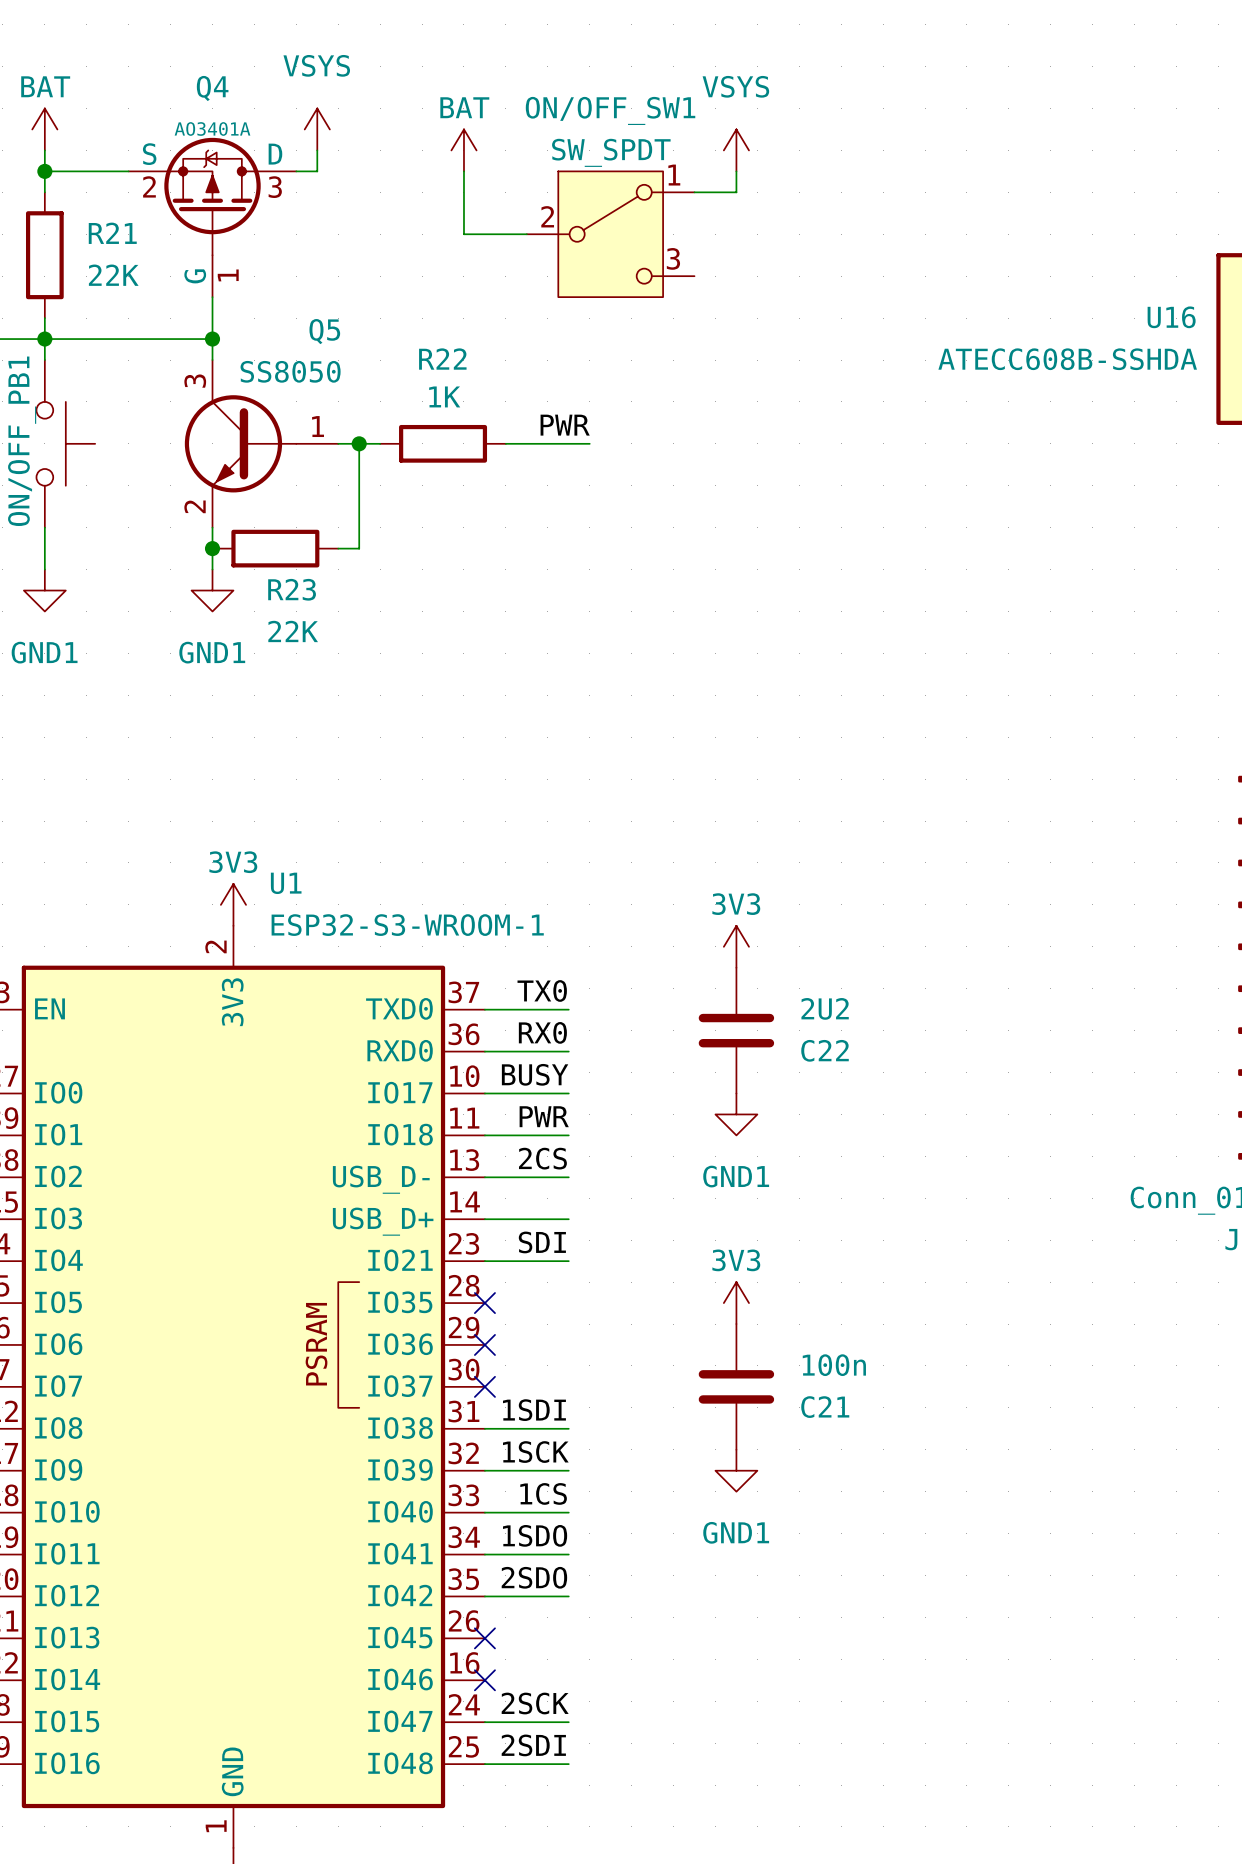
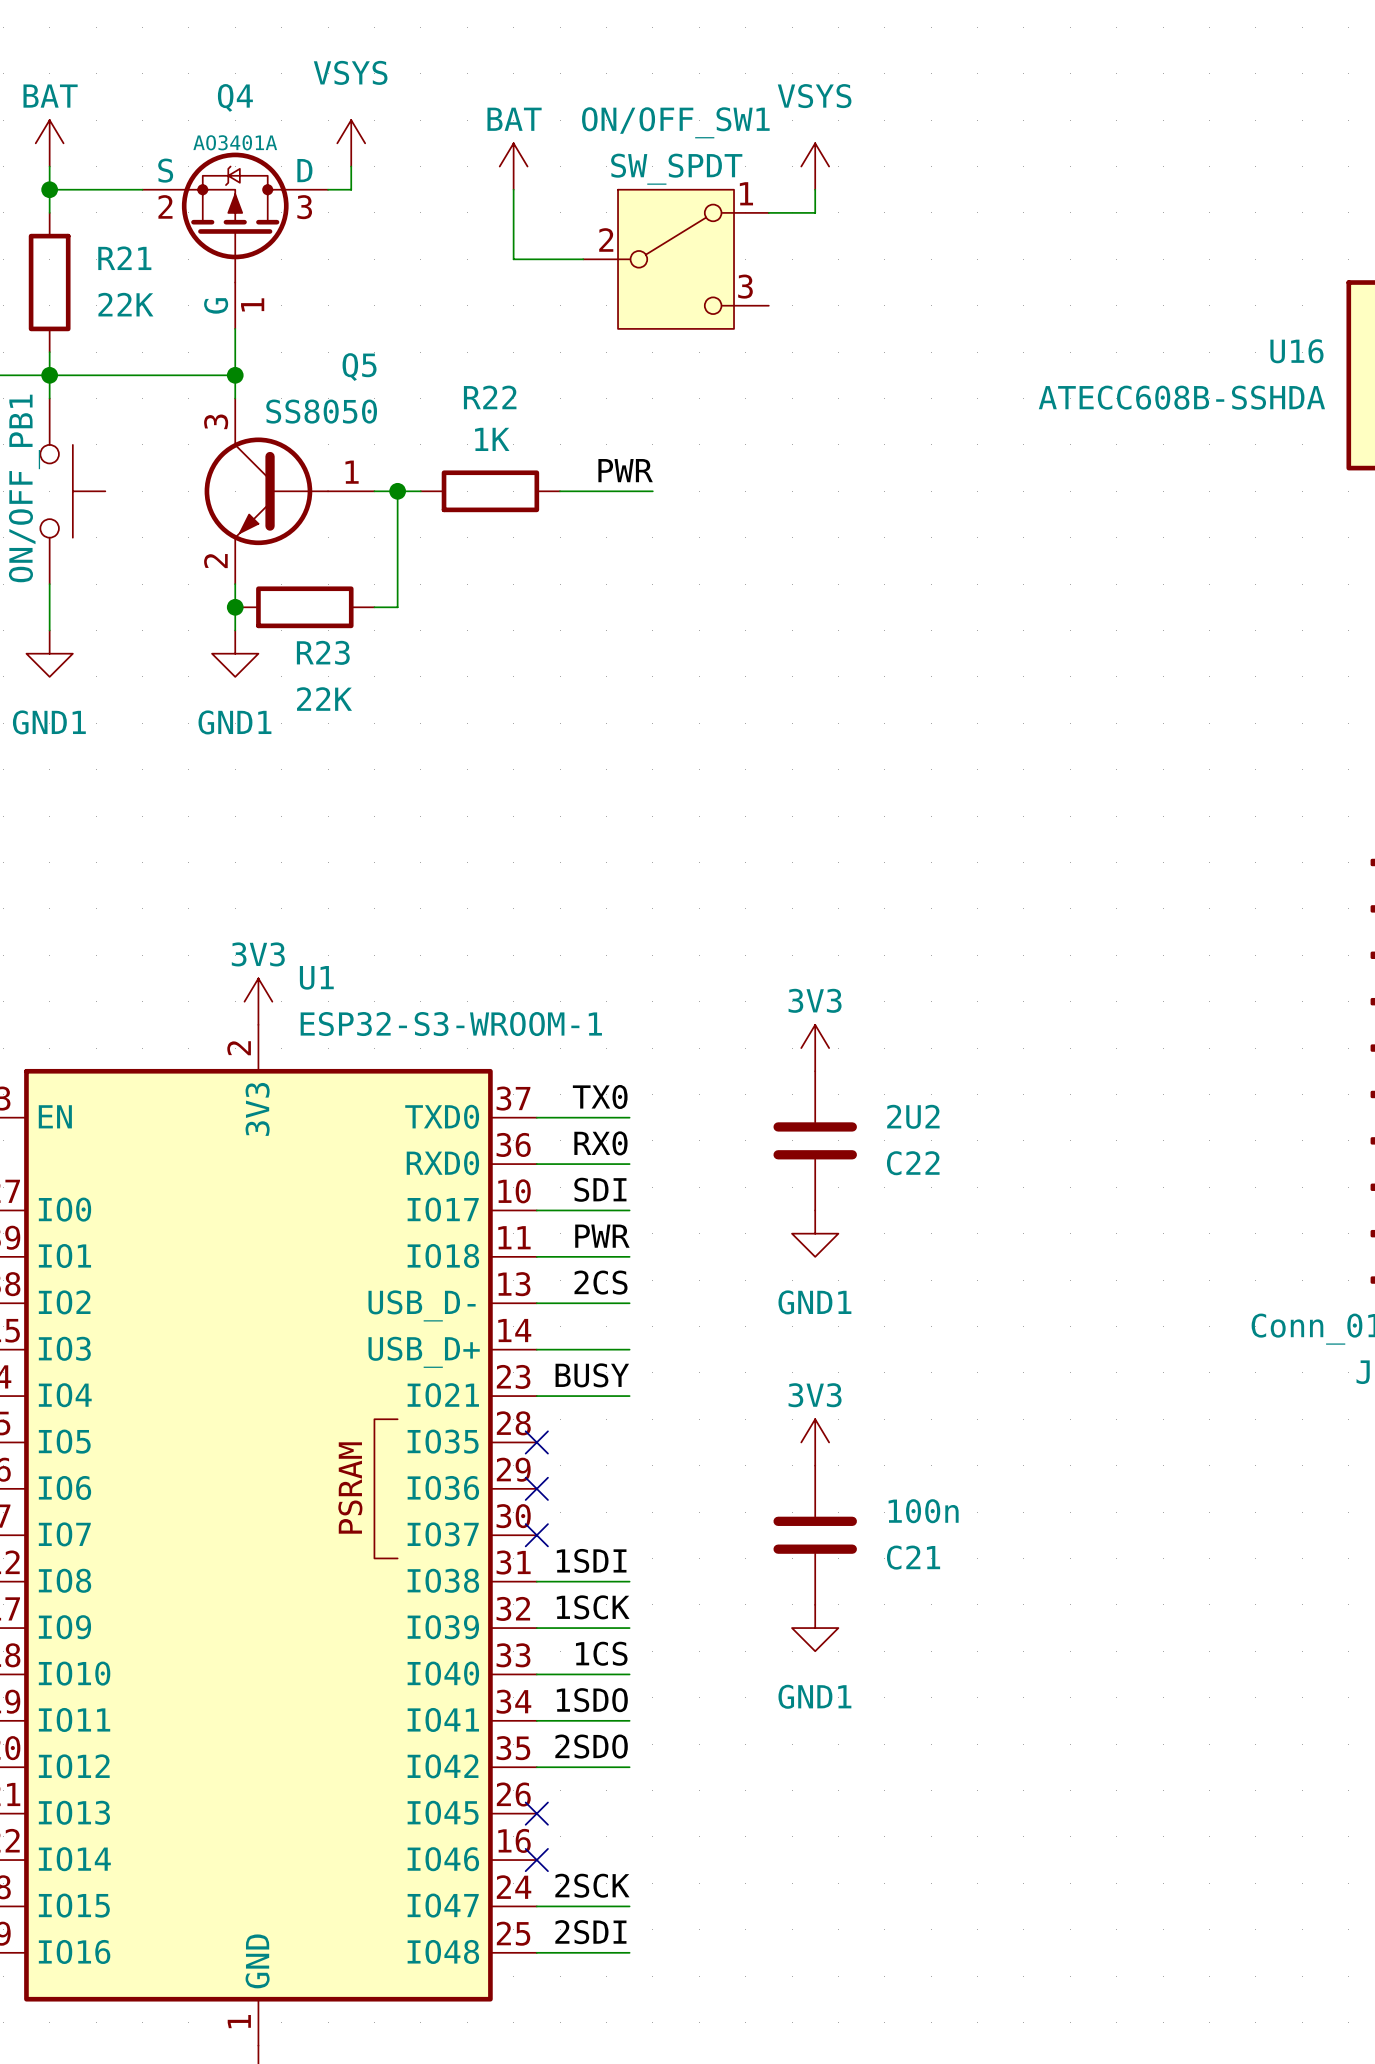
label: BUSY (535, 1074) -> SDI (600, 1189)
label: SDI (542, 1242) -> BUSY (592, 1375)

